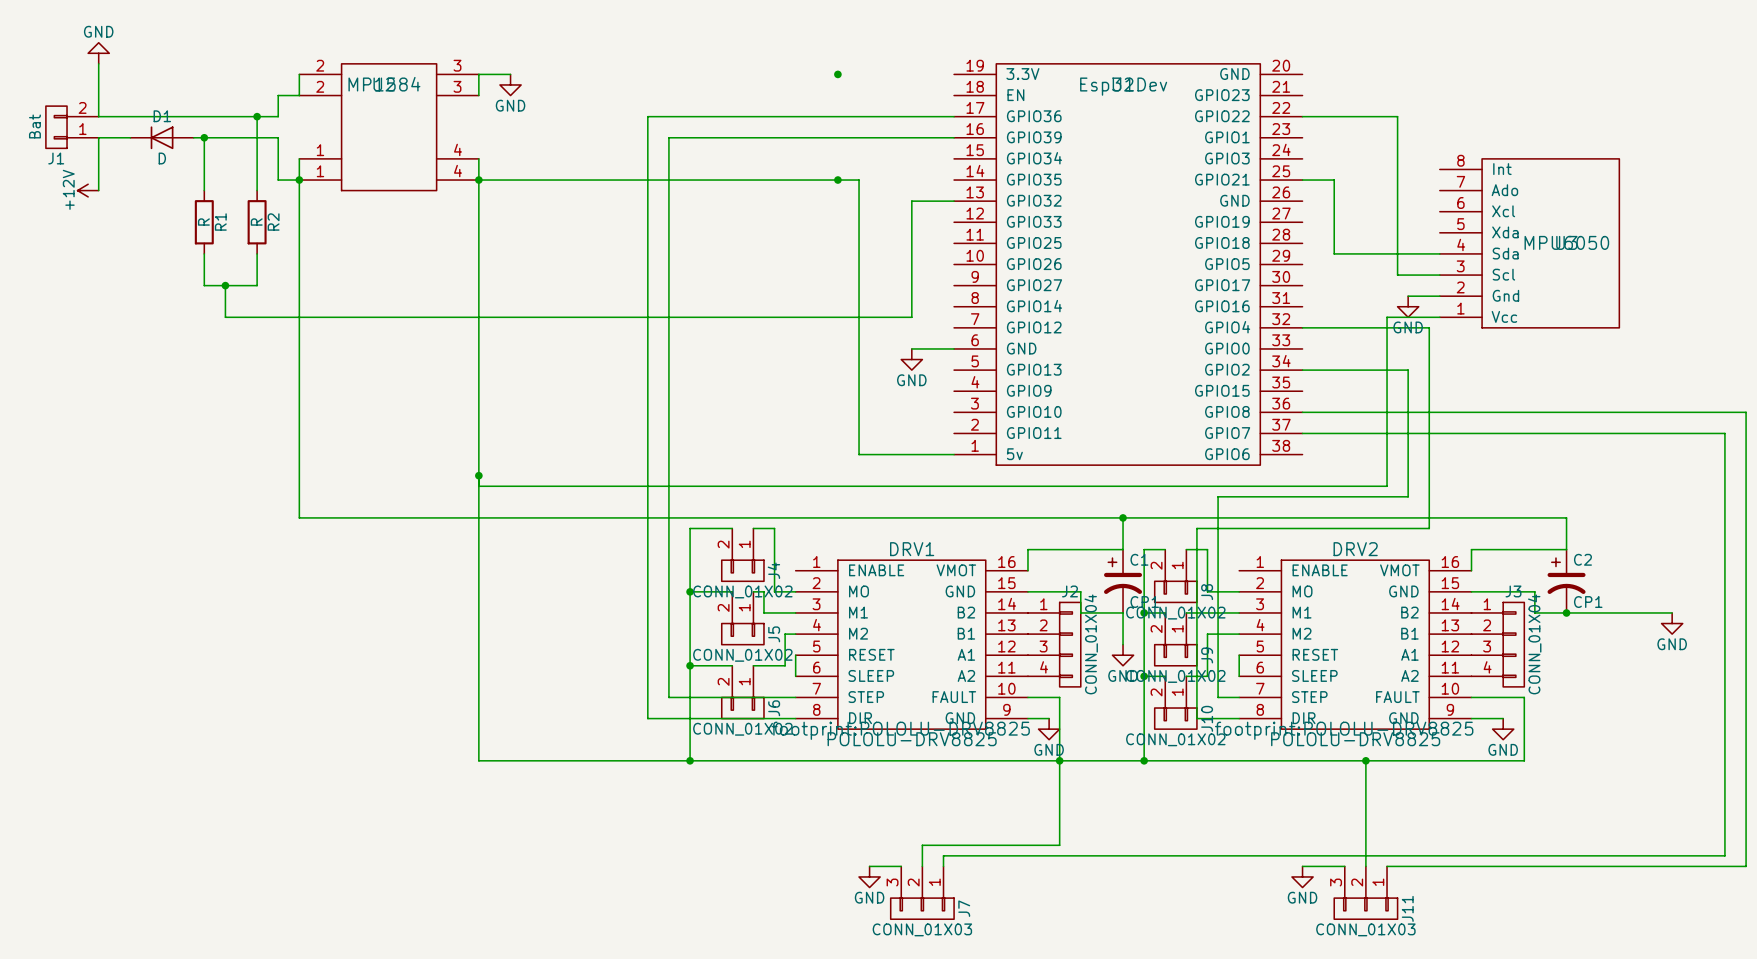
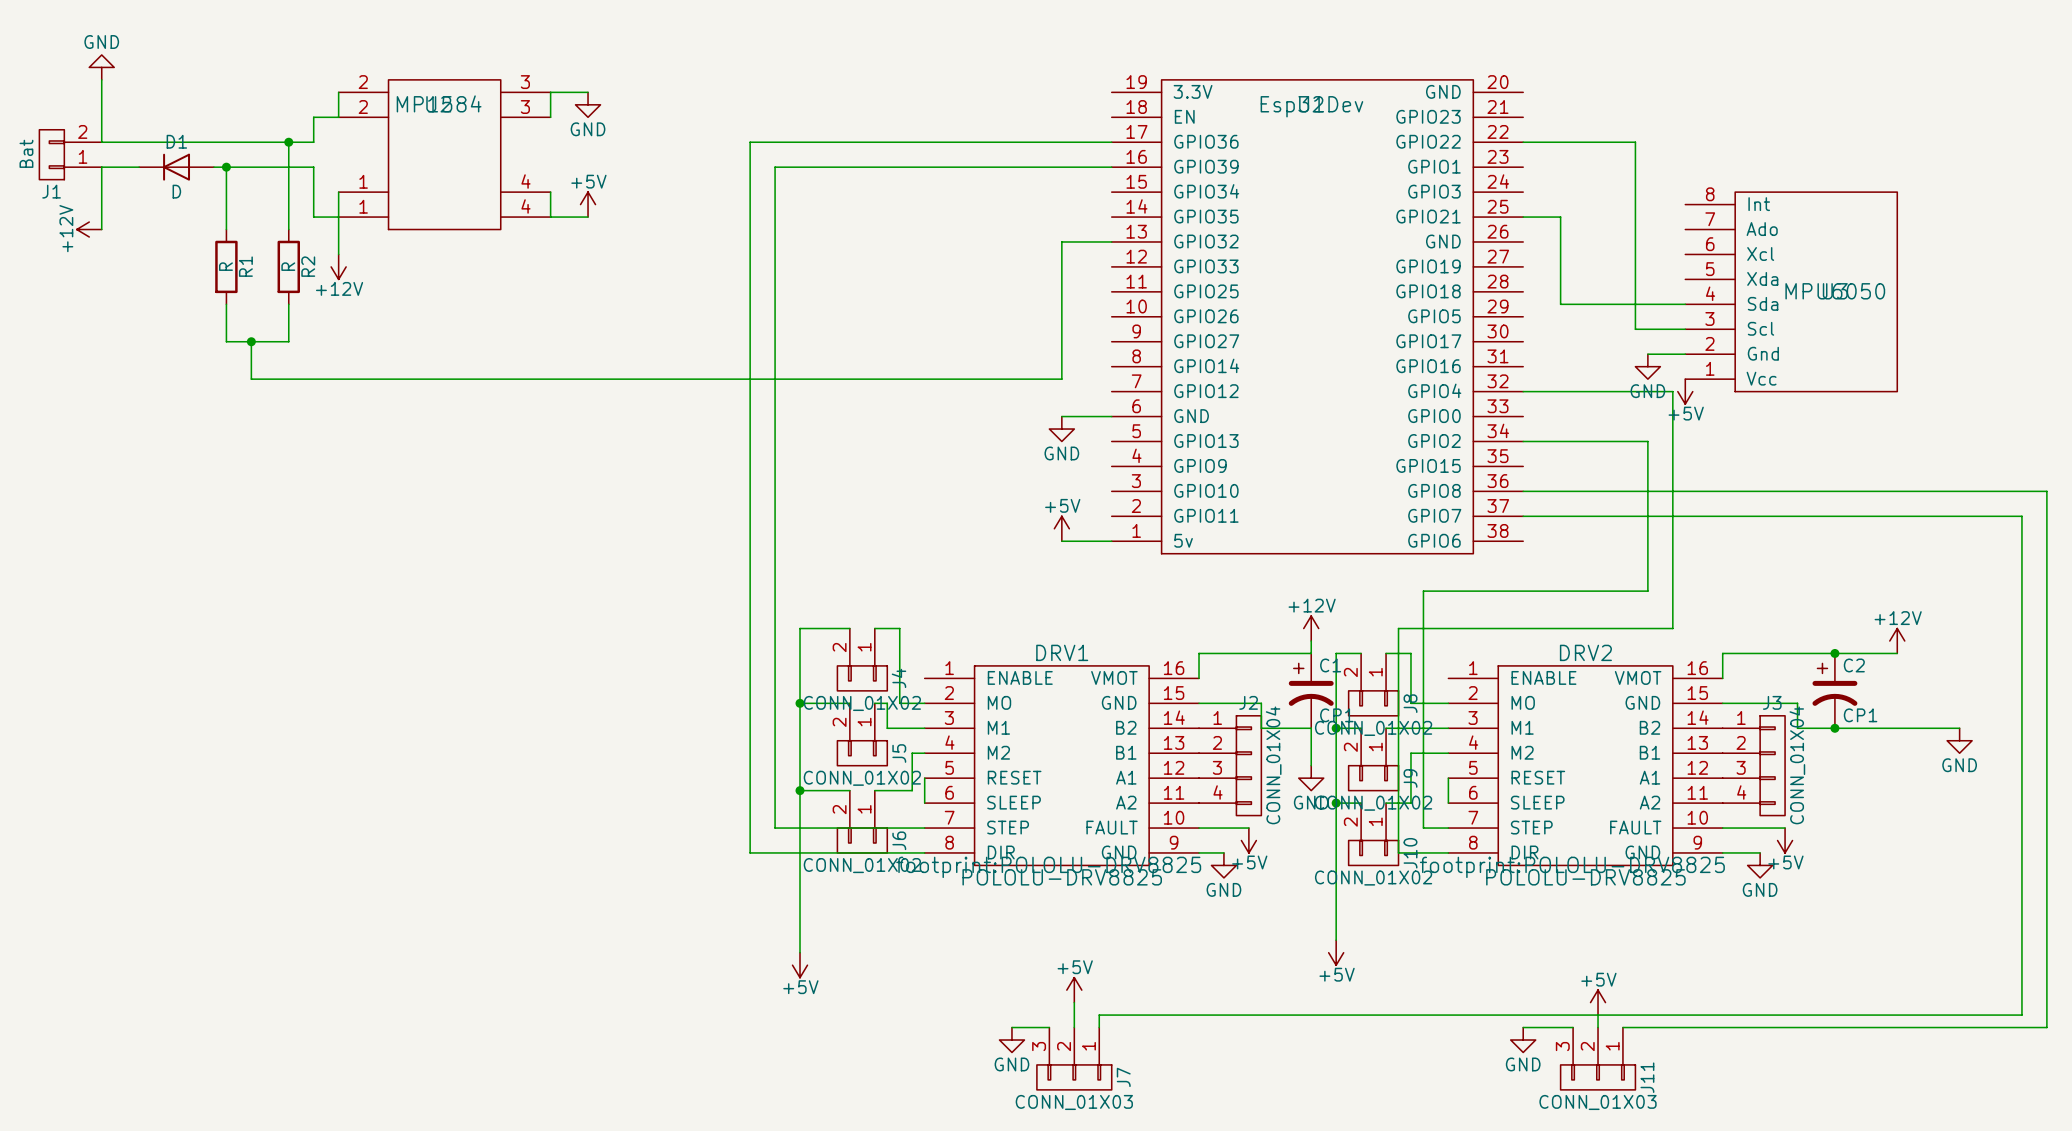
junction: (837, 74) -> none
power symbol: none -> +5V (588, 204)
junction: (299, 180) -> none
wire: (478, 180) (478, 760) (1524, 760) (1524, 697) -> none
junction: (478, 180) -> none
wire: (510, 180) (859, 180) (859, 454) (911, 454) -> none
junction: (837, 180) -> none
wire: (299, 211) (299, 517) (1566, 517) (1566, 549) -> (1897, 653) (1834, 653)
power symbol: none -> +12V (338, 266)
wire: (1439, 317) (1387, 317) (1387, 486) (478, 486) -> none
power symbol: none -> +5V (1685, 391)
power symbol: none -> +5V (1061, 528)
junction: (478, 475) -> none
junction: (1123, 517) -> none
power symbol: none -> +12V (1311, 628)
power symbol: none -> +12V (1897, 640)
junction: none -> (1834, 653)
wire: (1059, 697) (1059, 845) (922, 845) -> (1236, 828) (1248, 828)
power symbol: none -> +5V (1248, 840)
power symbol: none -> +5V (1785, 840)
wire: none -> (800, 902) (800, 952)
junction: (690, 760) -> none
junction: (1059, 760) -> none
wire: none -> (1336, 902) (1336, 940)
junction: (1144, 760) -> none
wire: (1365, 760) (1365, 855) -> none
junction: (1365, 760) -> none
power symbol: none -> +5V (1336, 952)
power symbol: none -> +5V (800, 965)
power symbol: none -> +5V (1074, 990)
power symbol: none -> +5V (1598, 1002)

